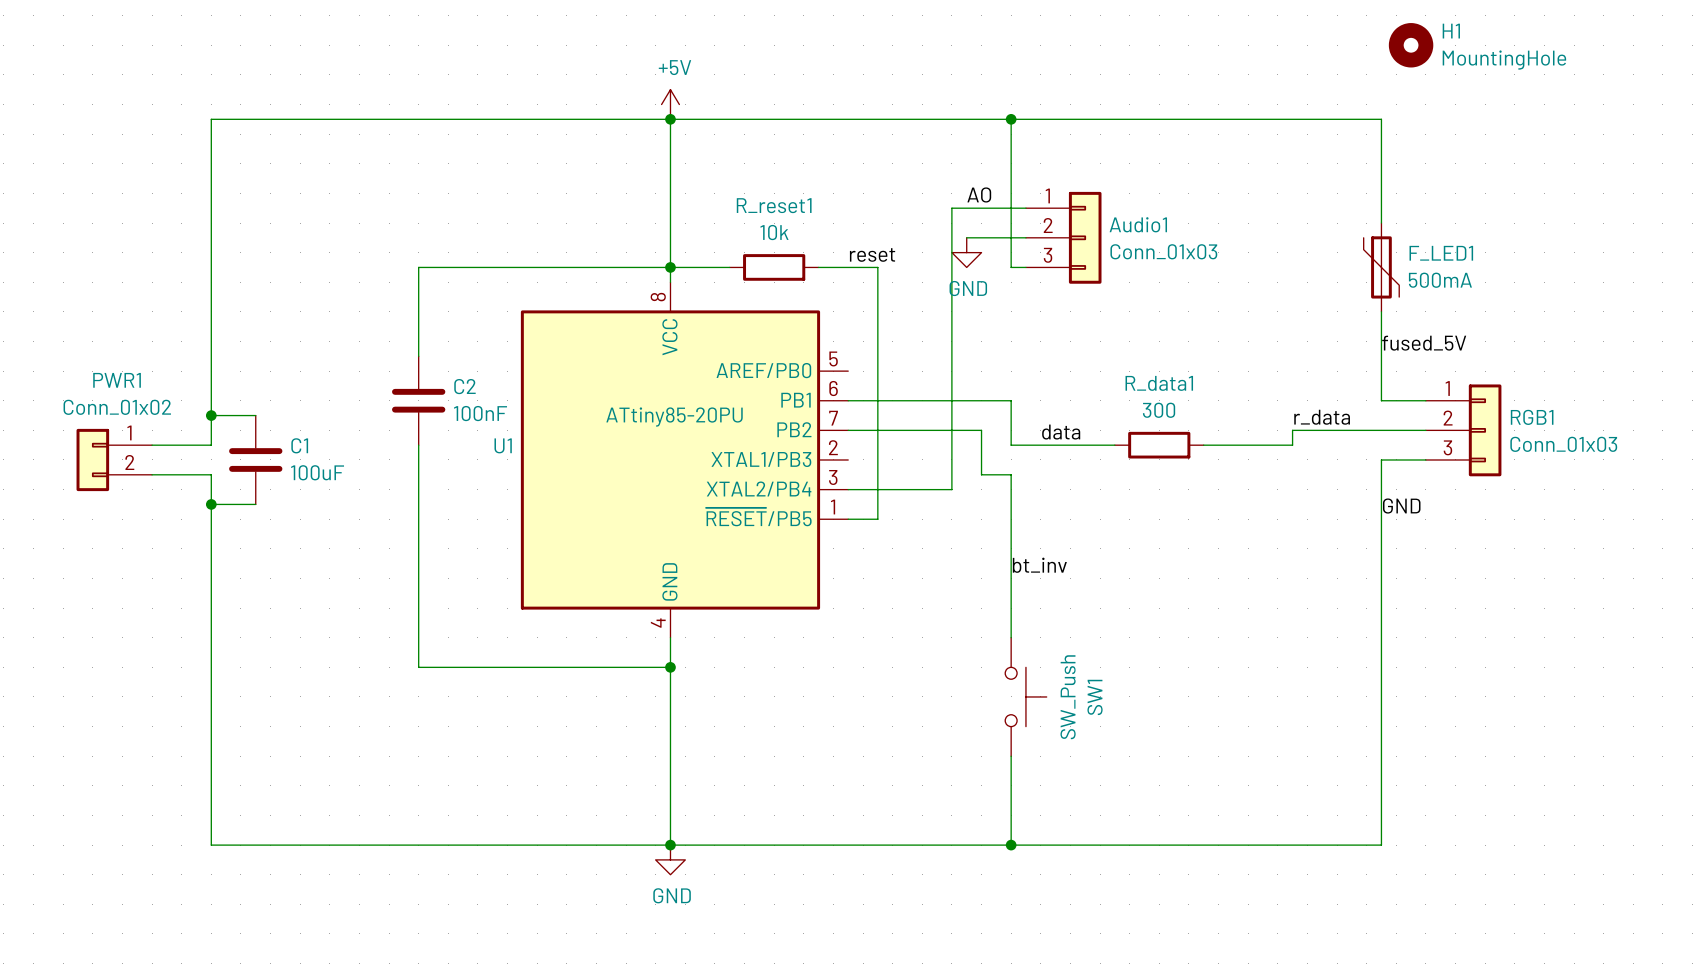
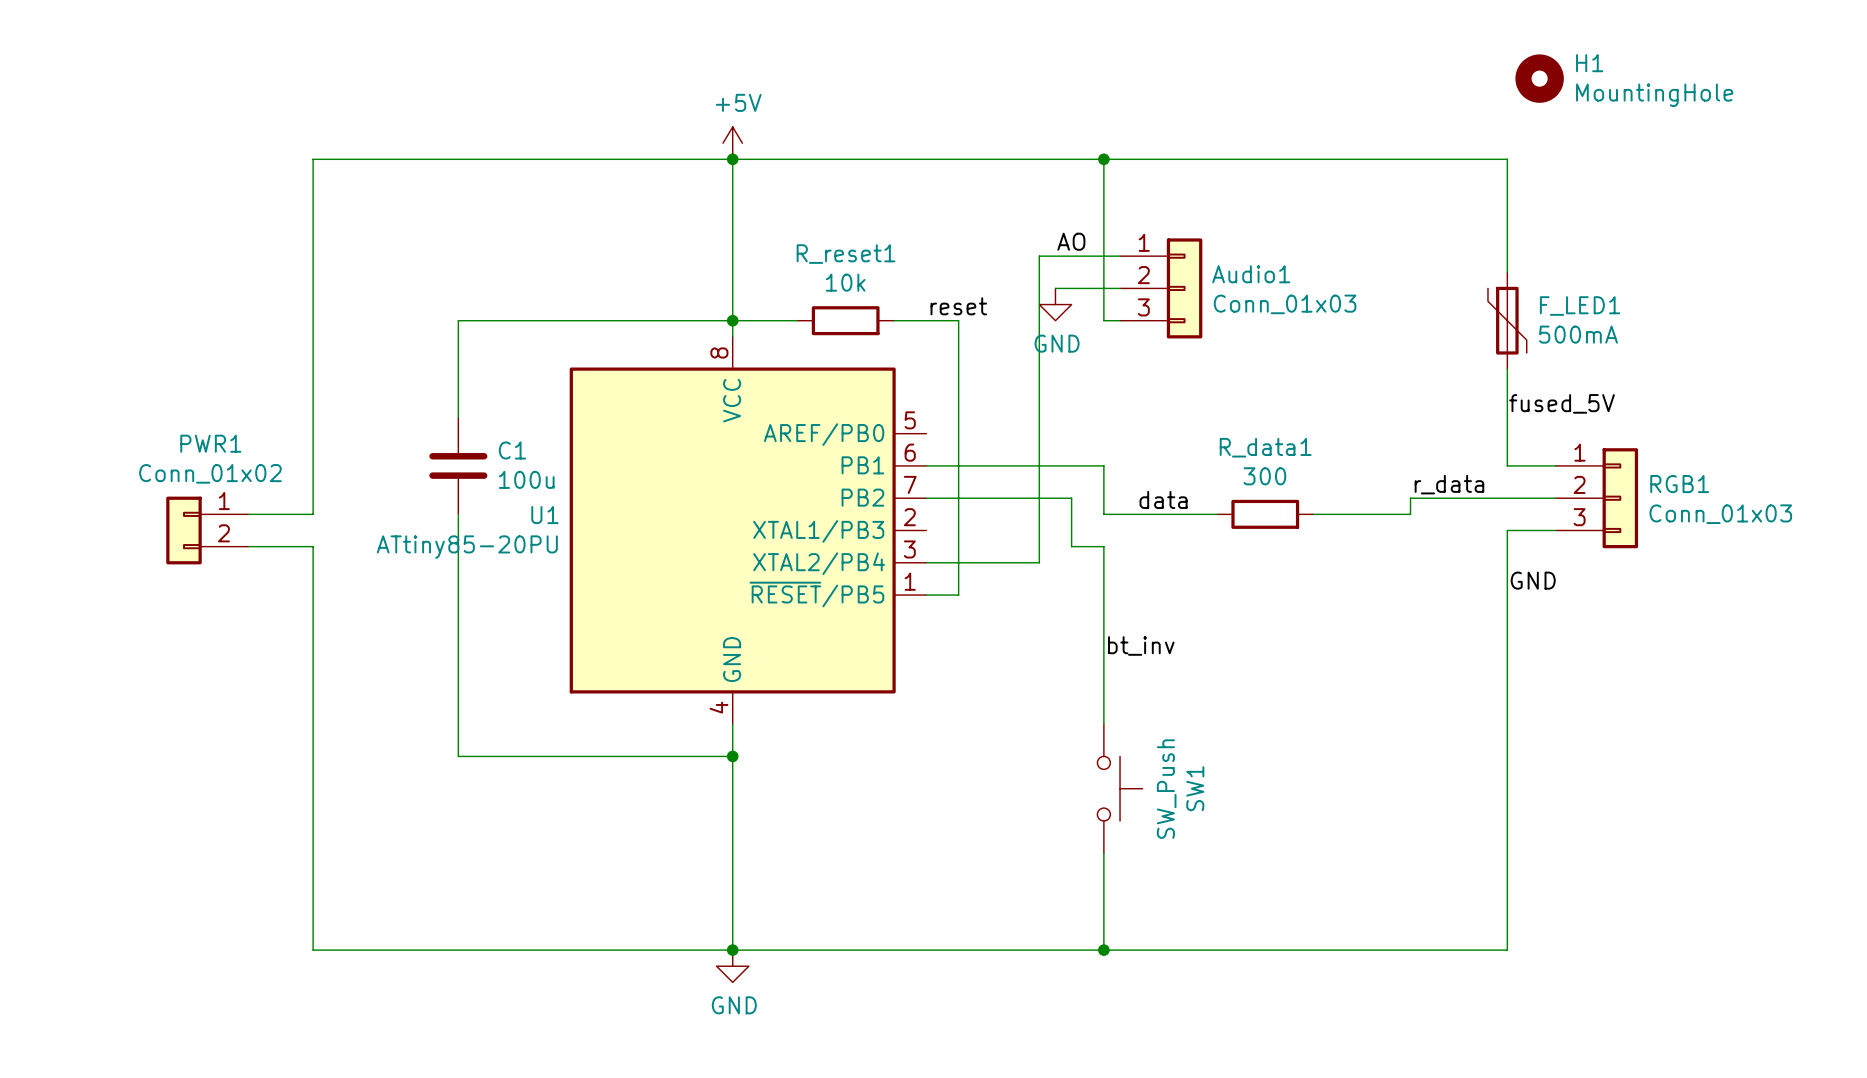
wire: (285, 119) (211, 119) (211, 445) (152, 445) -> (313, 159) (313, 514) (248, 514)
C2 name: C2 (464, 386) -> C1 (512, 450)
C2 value: 100nF (480, 413) -> 100u (526, 479)
wire: (211, 415) (255, 415) -> none
junction: (211, 415) -> none
U1 value position: ATtiny85-20PU (674, 417) -> ATtiny85-20PU (467, 547)
PWR1 position: (114, 459) -> (207, 530)
C1: 100uF (255, 459) -> none
wire: (152, 474) (211, 474) (211, 845) (285, 845) -> (248, 546) (313, 546) (313, 950)
wire: (211, 504) (255, 504) -> none
junction: (211, 504) -> none

